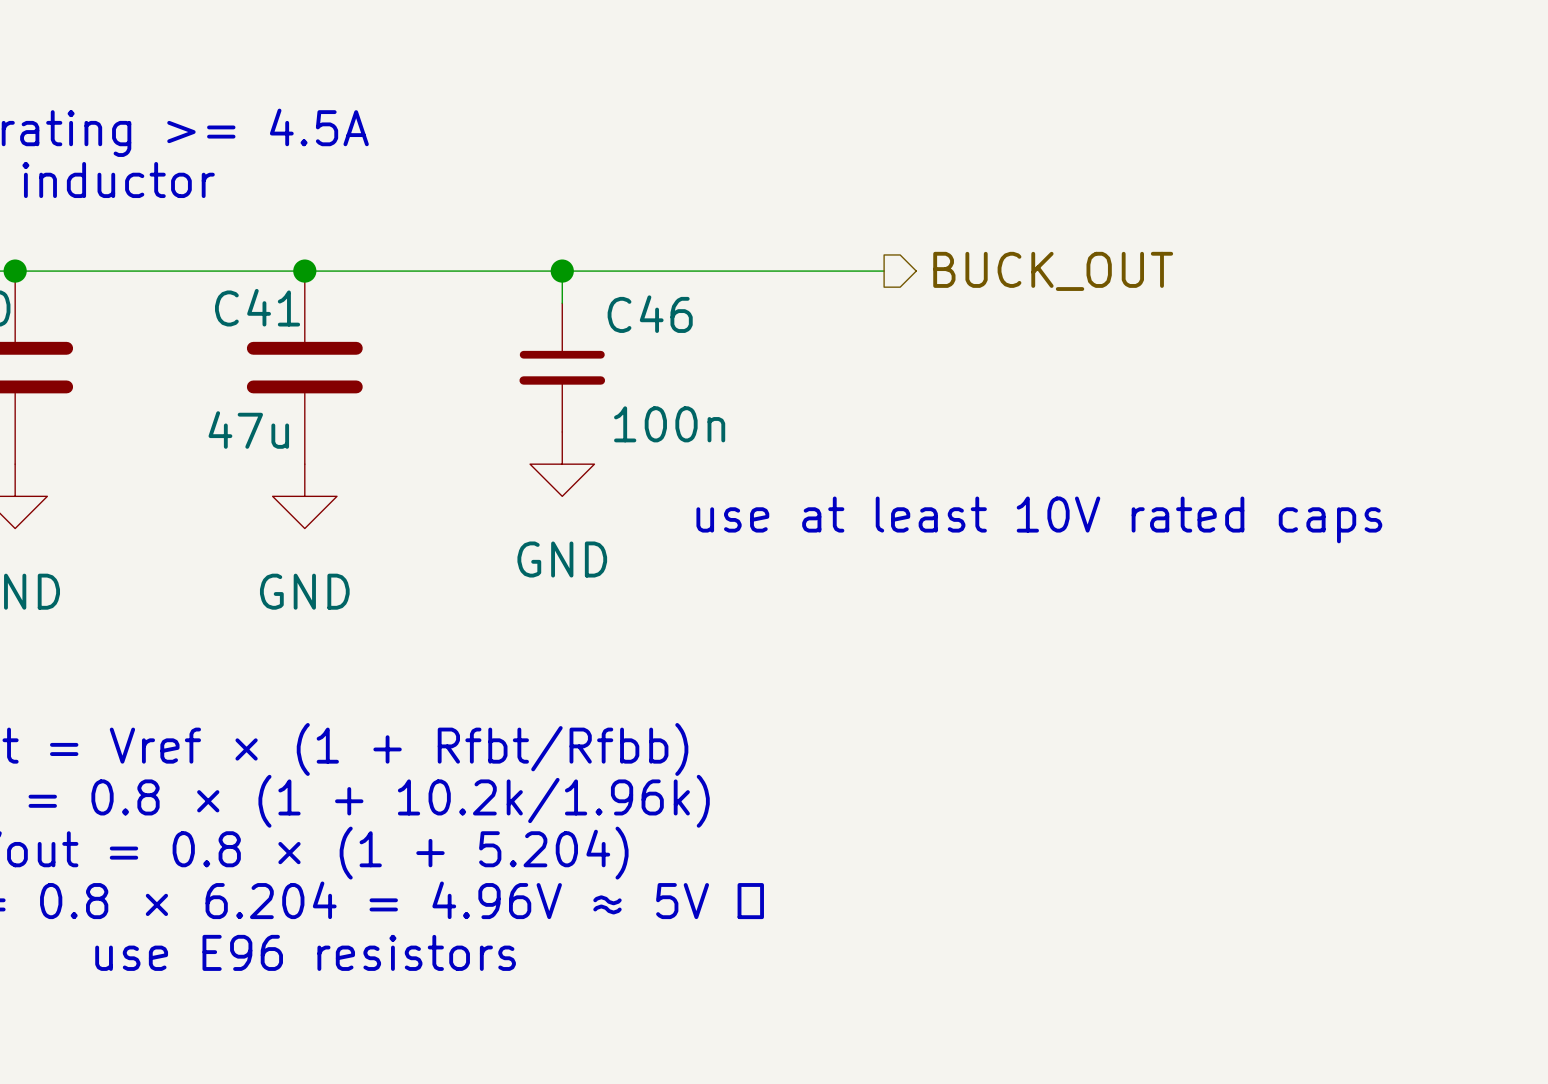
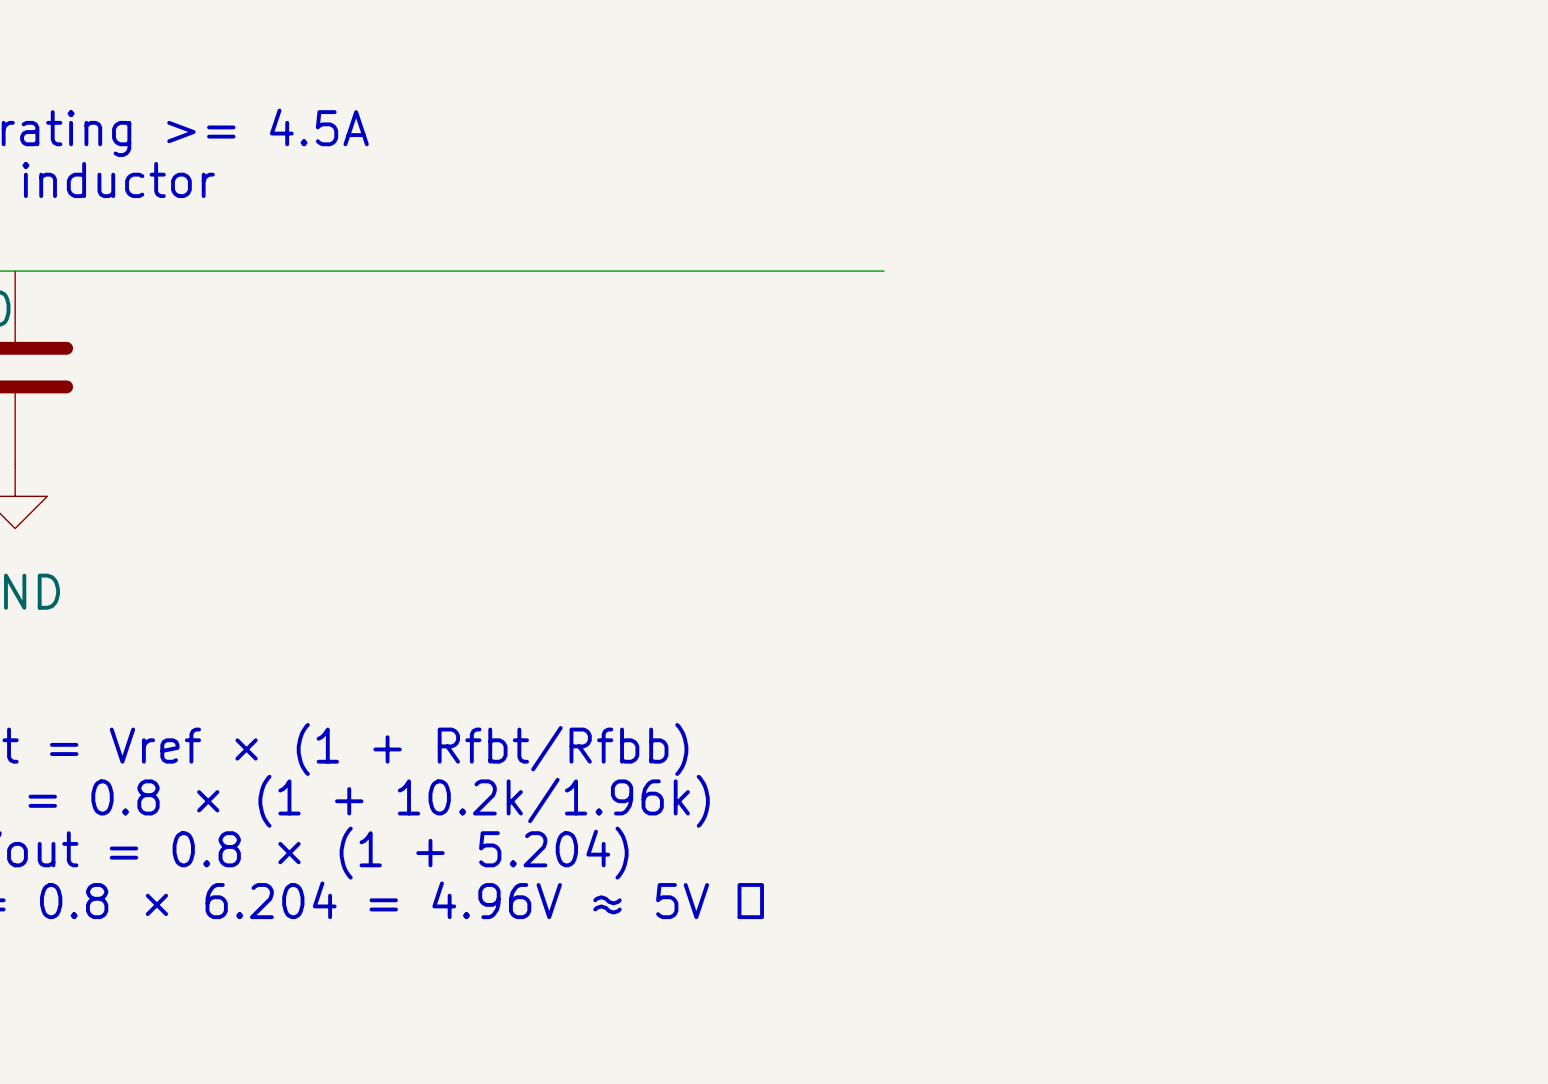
junction: (15, 271) -> none
junction: (304, 271) -> none
wire: (562, 271) (562, 303) -> none
junction: (562, 271) -> none
hierarchical label: BUCK_OUT (1053, 271) -> none
C41: 47u (304, 367) -> none
C46: 100n (562, 367) -> none
power symbol: GND (562, 464) -> none
power symbol: GND (304, 496) -> none
text: use at least 10V rated caps (1039, 519) -> none
text: use E96 resistors (305, 952) -> none

